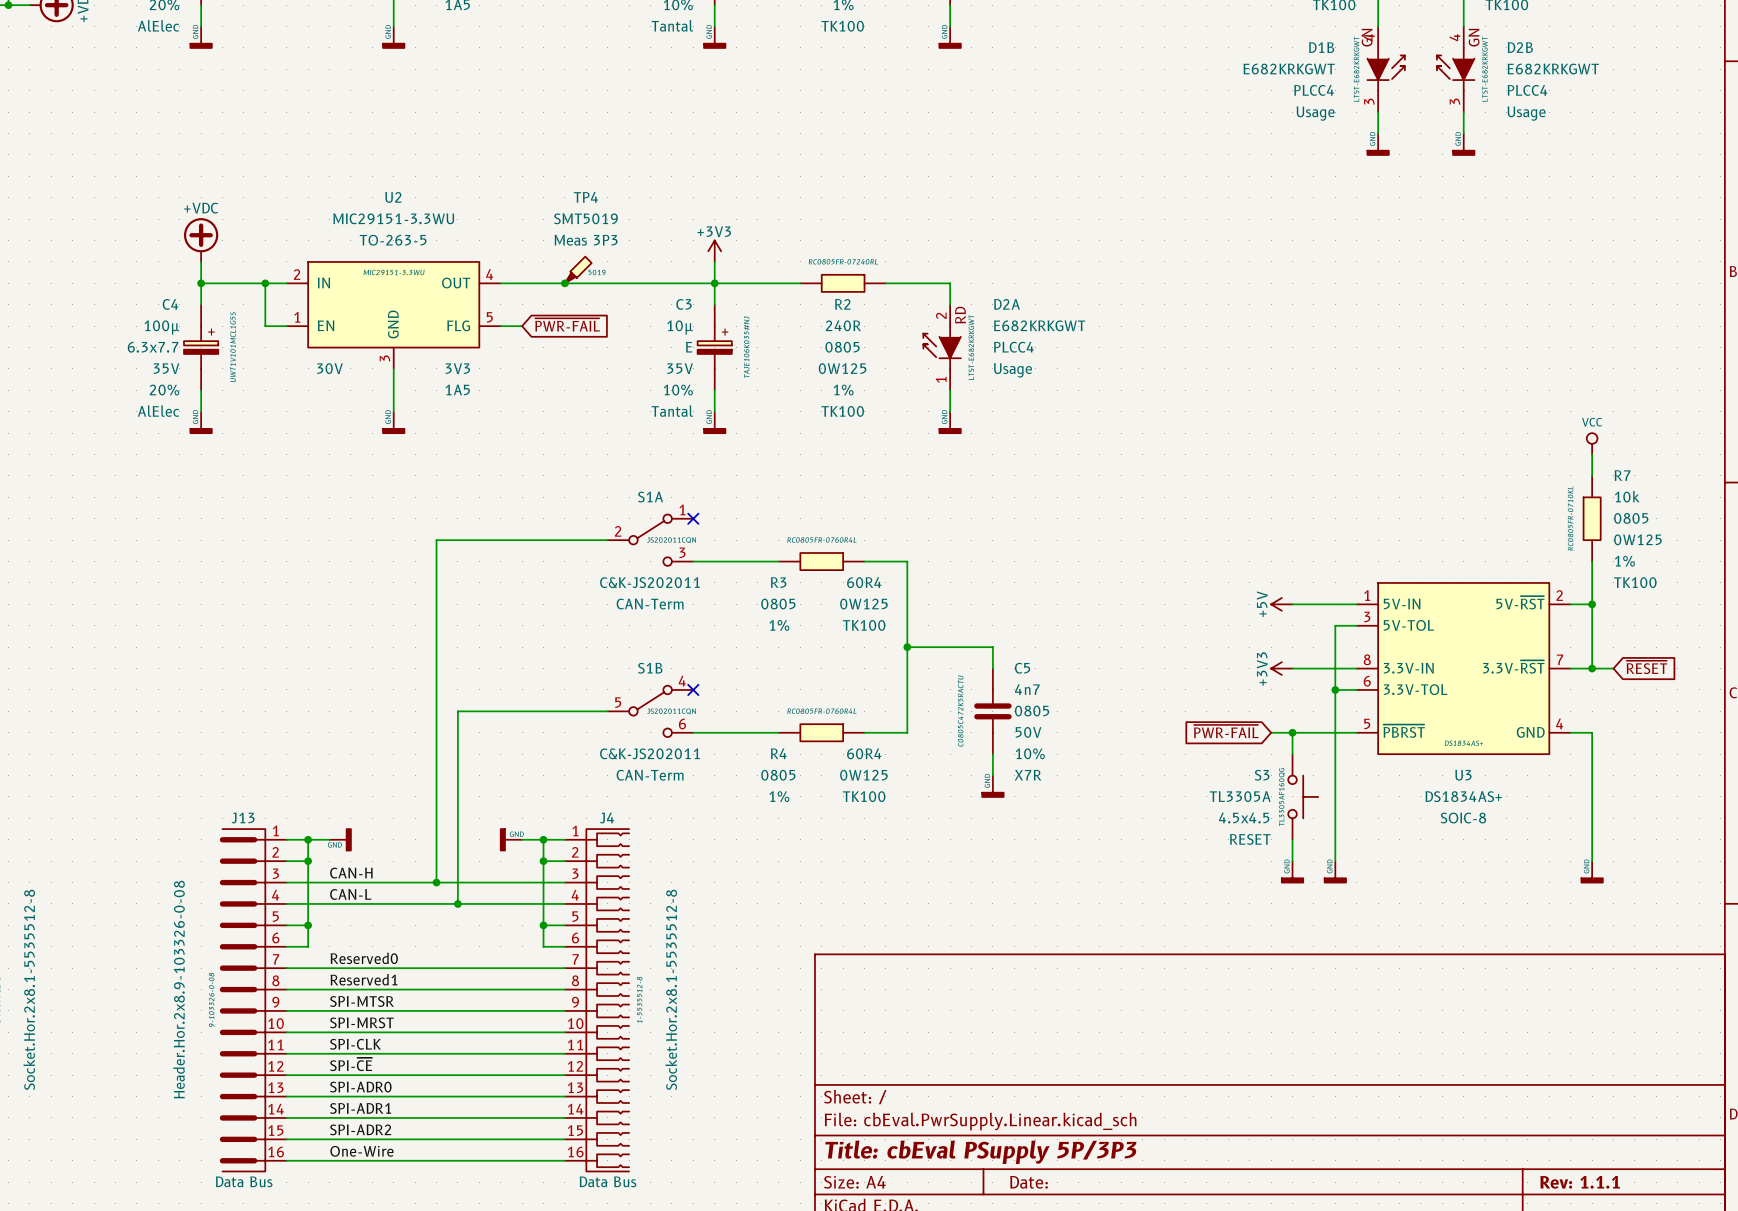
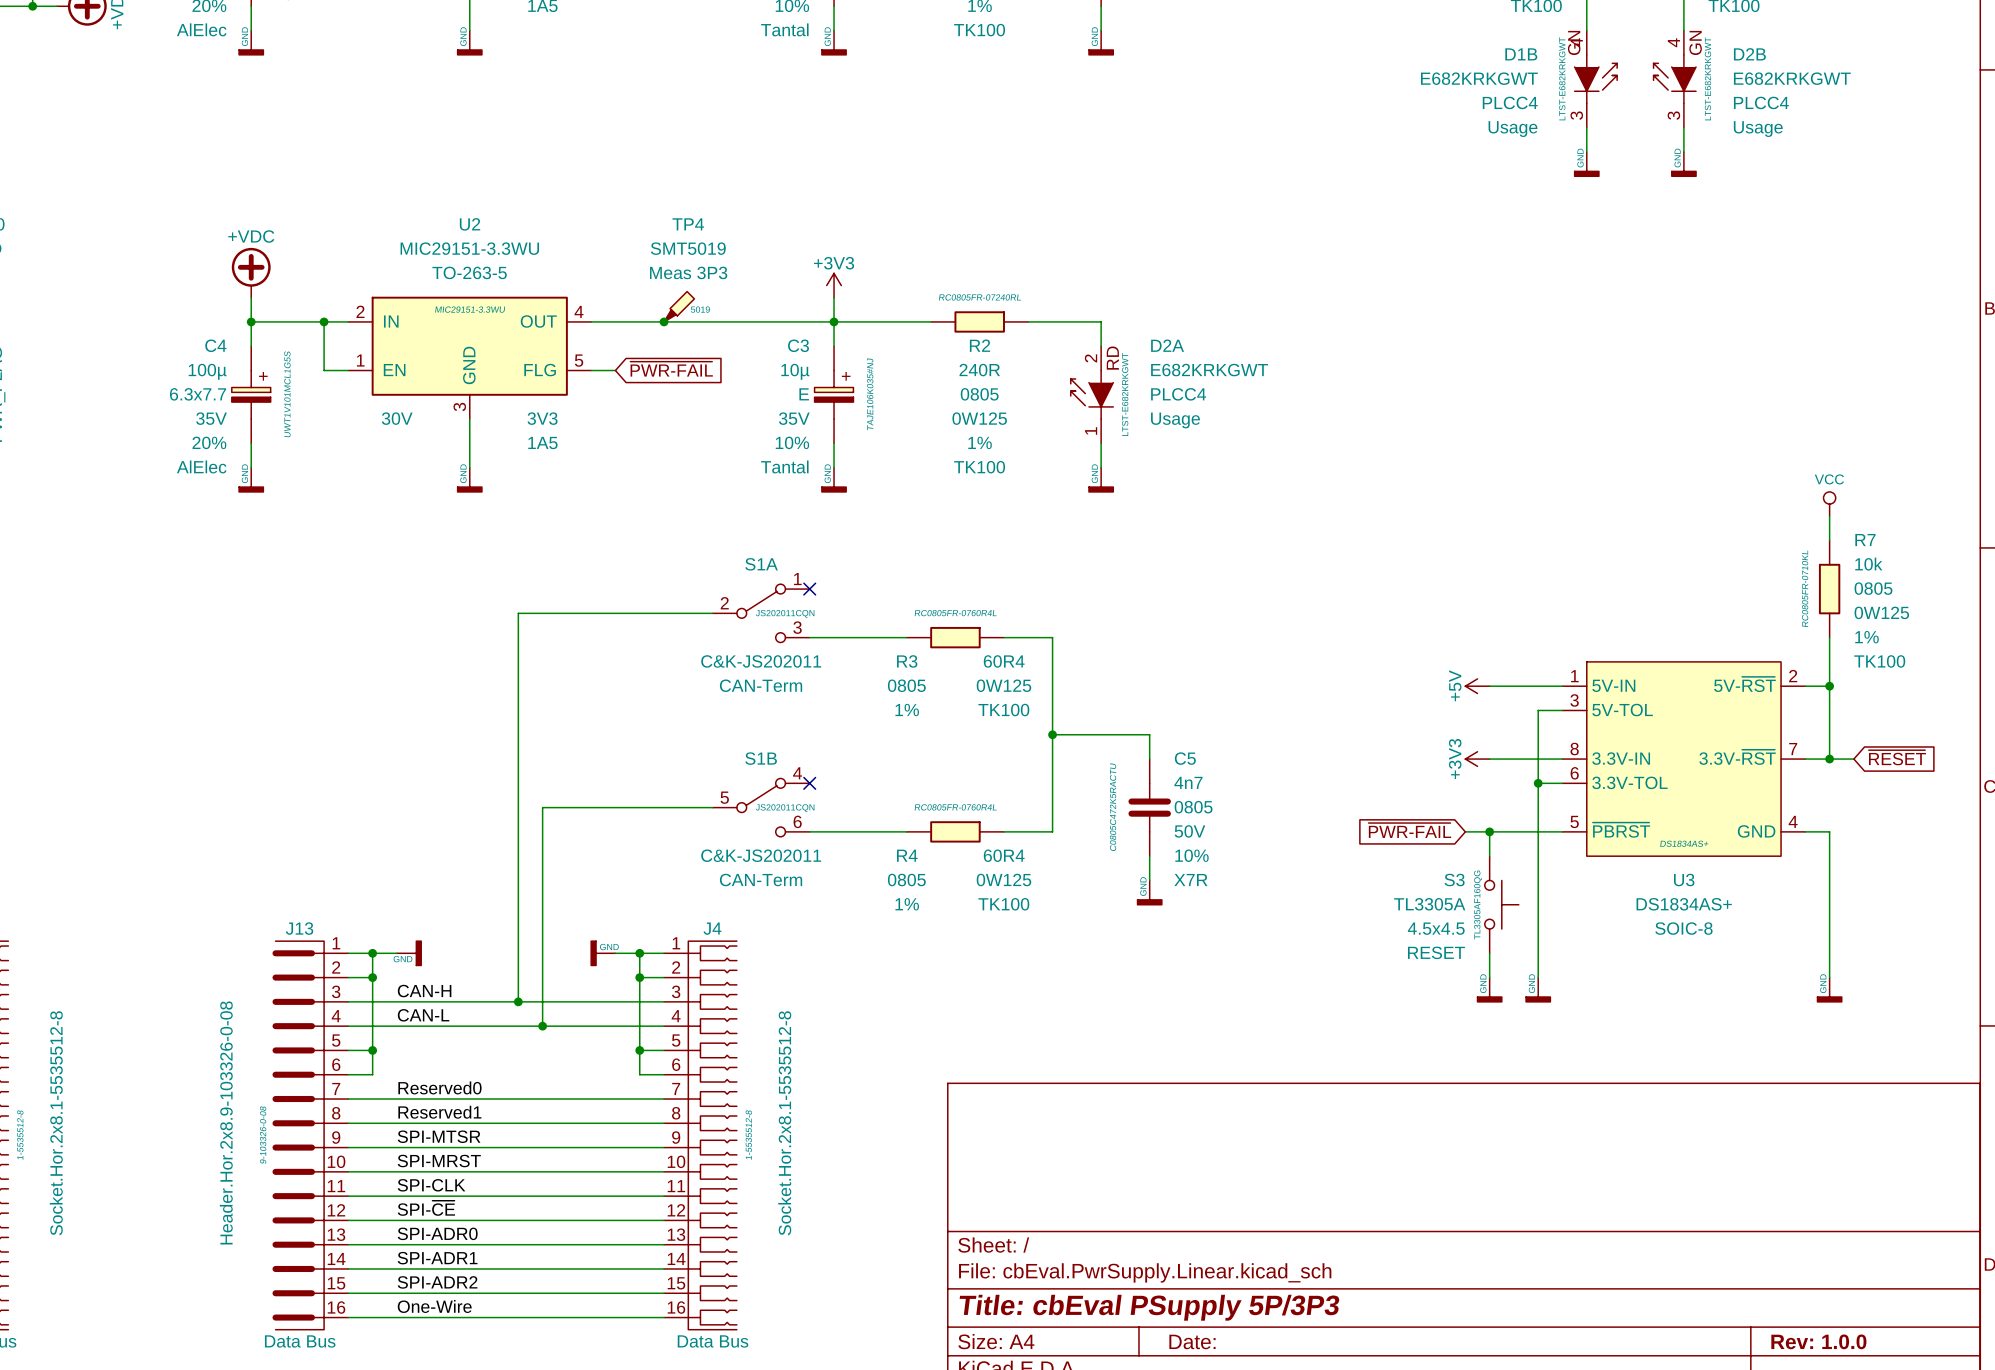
title block: Rev: 1.1.1 (1580, 1182) -> Rev: 1.0.0 (1818, 1341)

